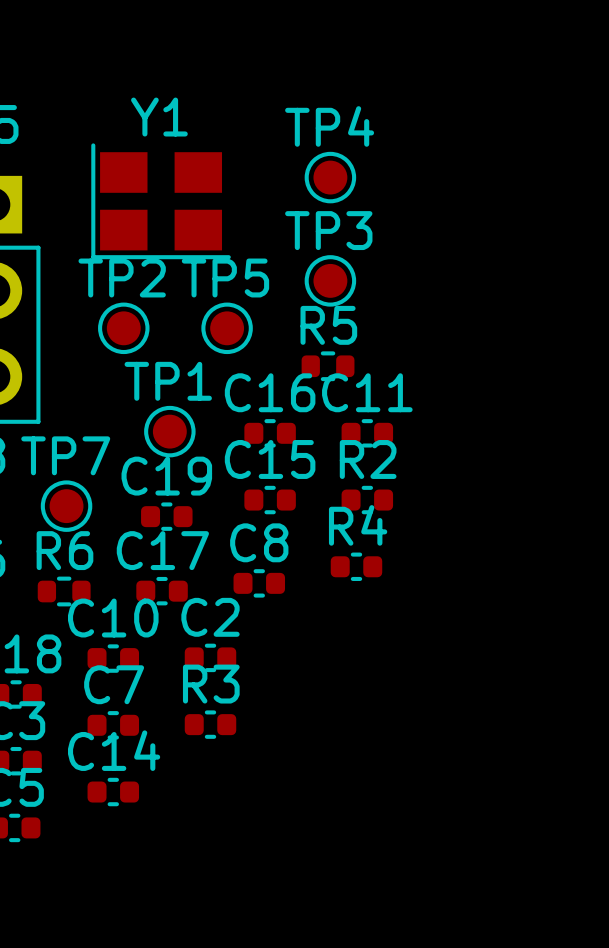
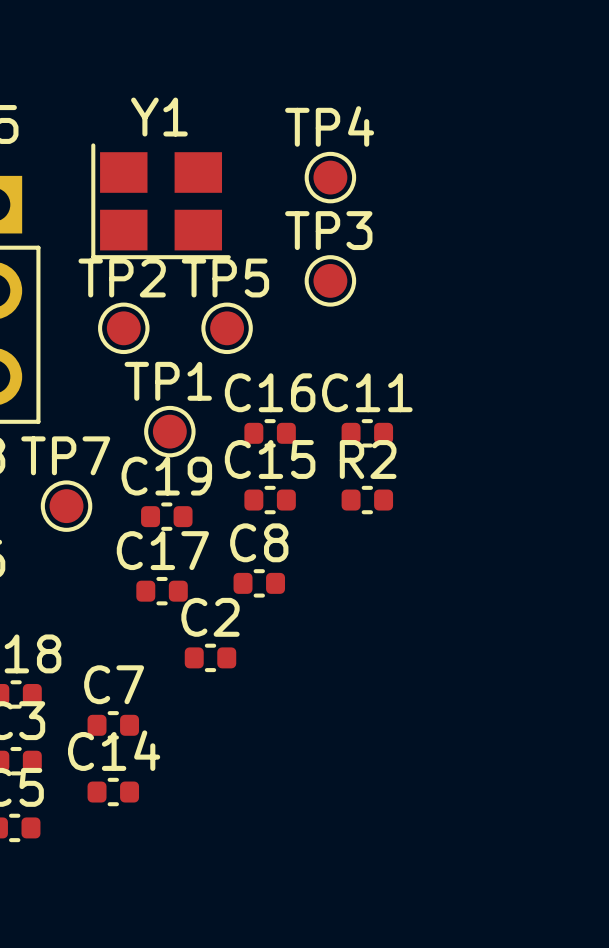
R5: (328, 366) -> none
R4: (356, 566) -> none
R6: (64, 591) -> none
C10: (113, 658) -> none
R3: (210, 724) -> none

